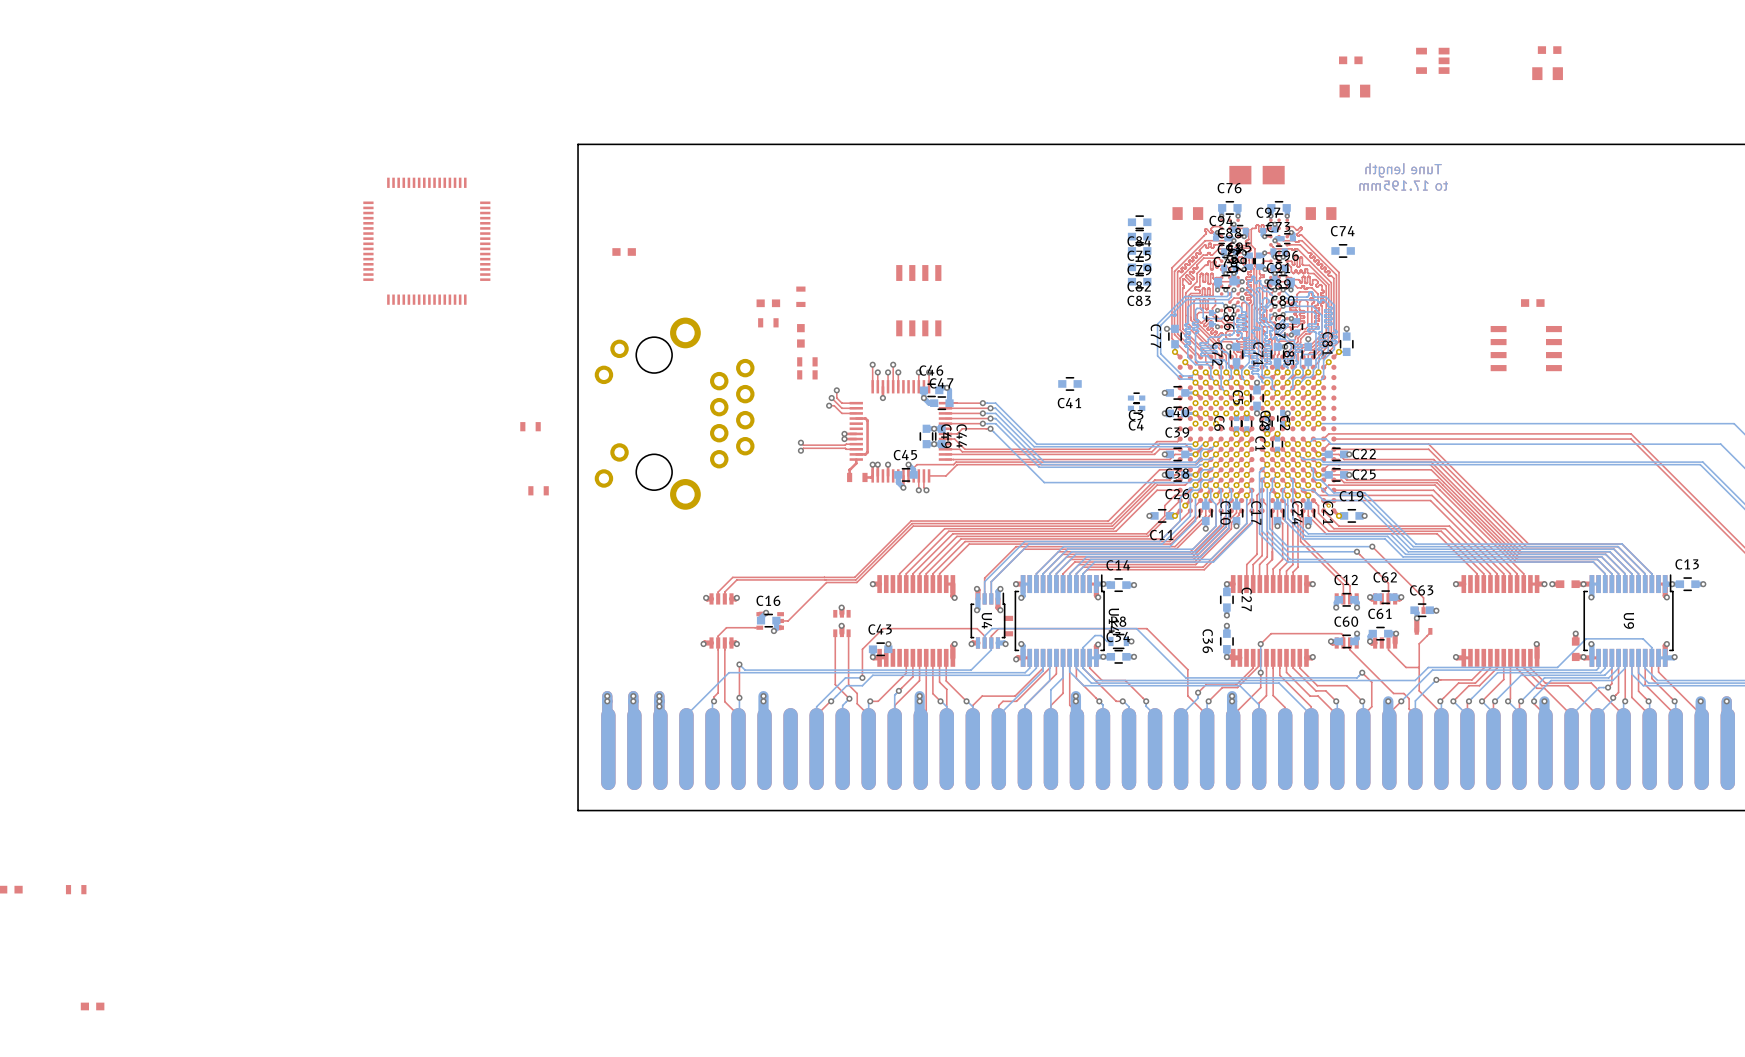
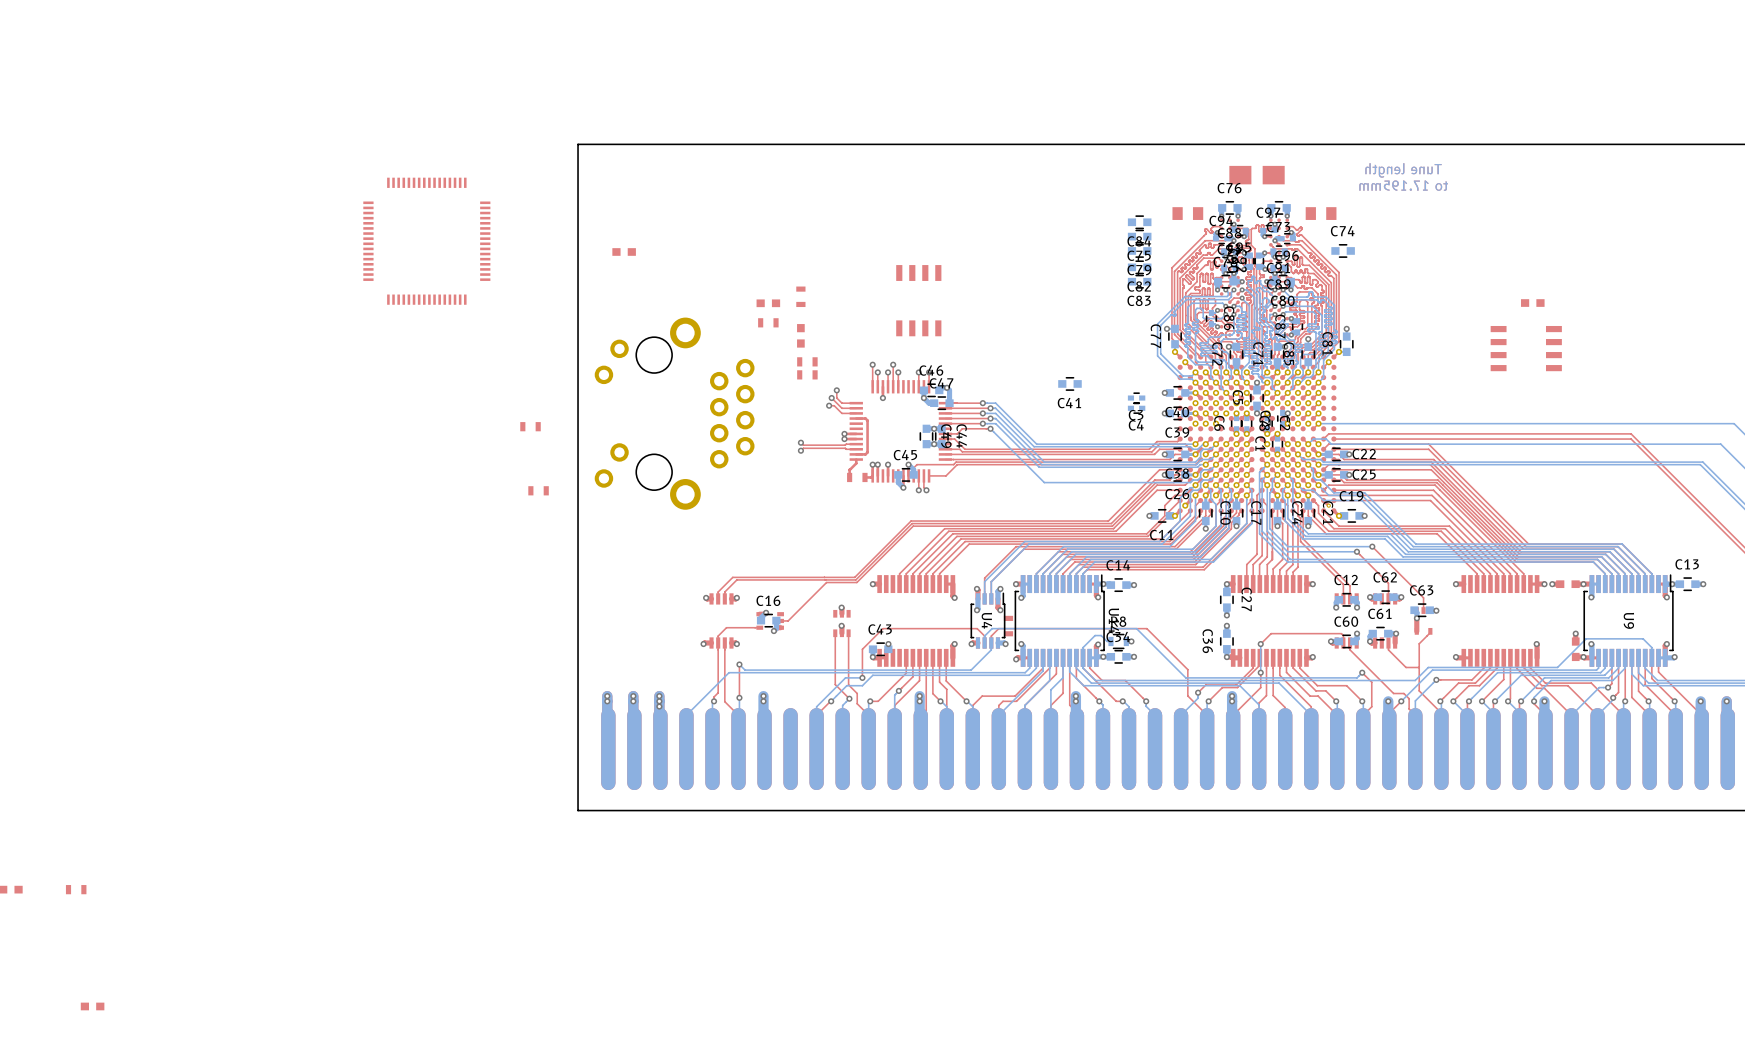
part: (1549, 50) -> none
part: (1350, 60) -> none
part: (1432, 60) -> none
part: (1547, 73) -> none
part: (1354, 91) -> none

